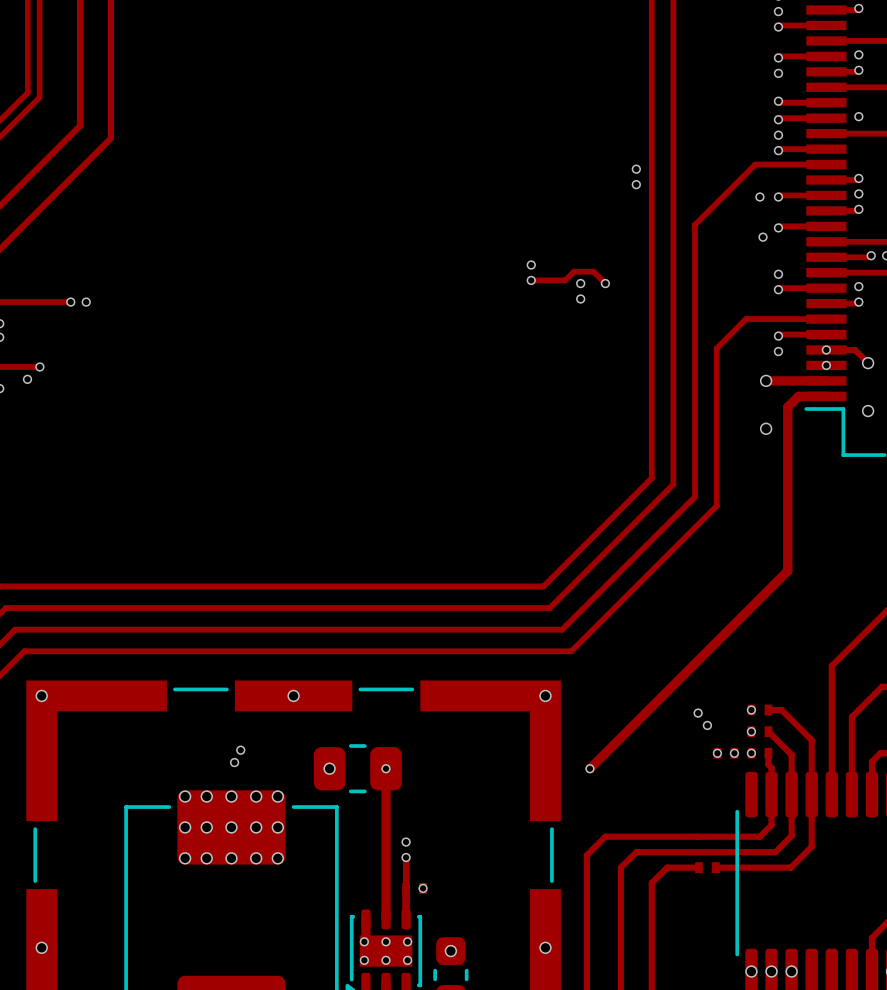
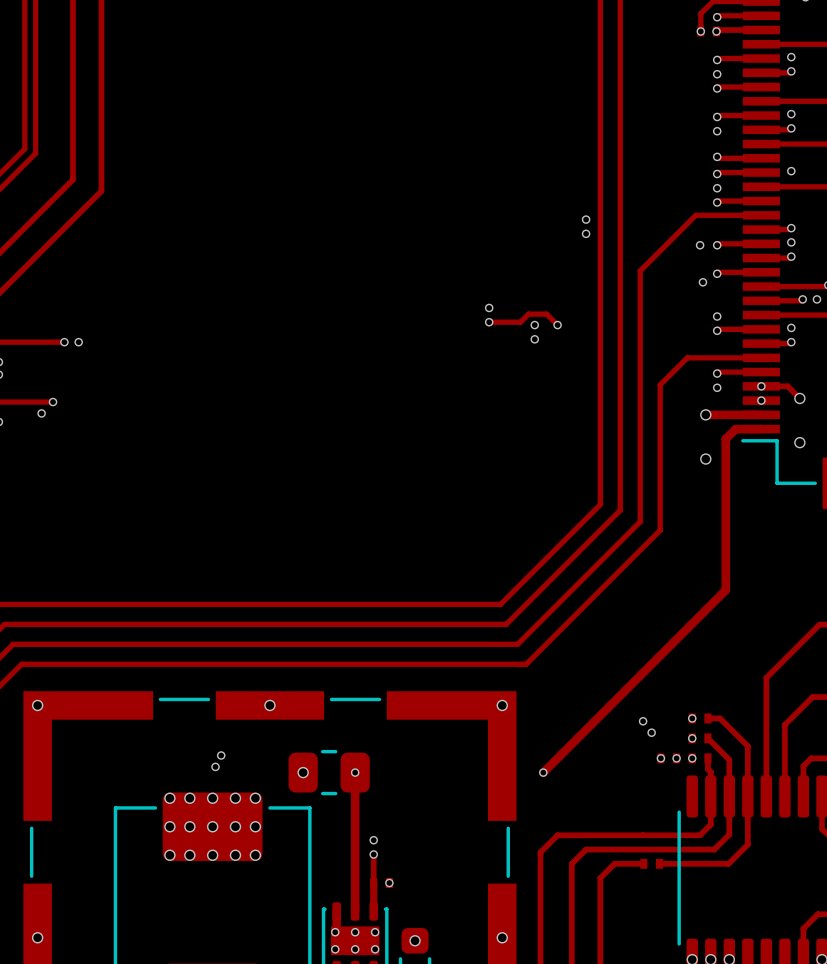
track: none -> (35, 402) (53, 402)
via: (39, 366) -> none
via: none -> (53, 402)
via: (27, 379) -> none
via: none -> (41, 413)

